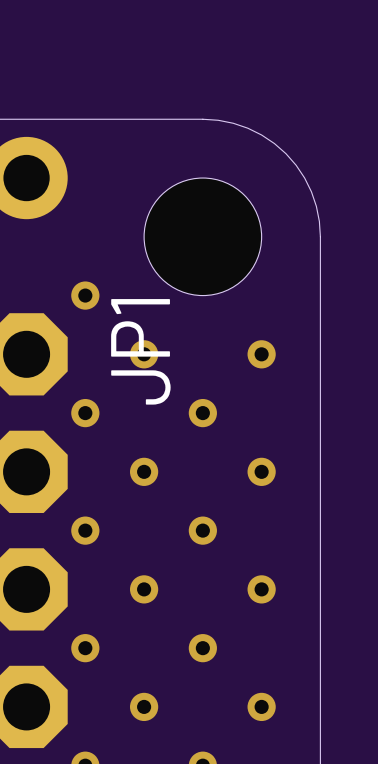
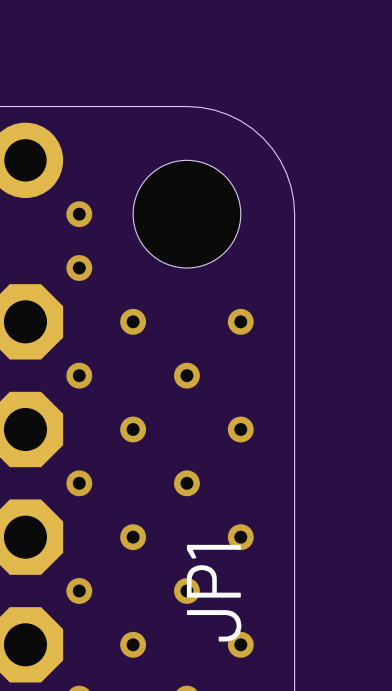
via: none -> (79, 214)
JP1 name position: JP1 (140, 351) -> JP1 (214, 593)

